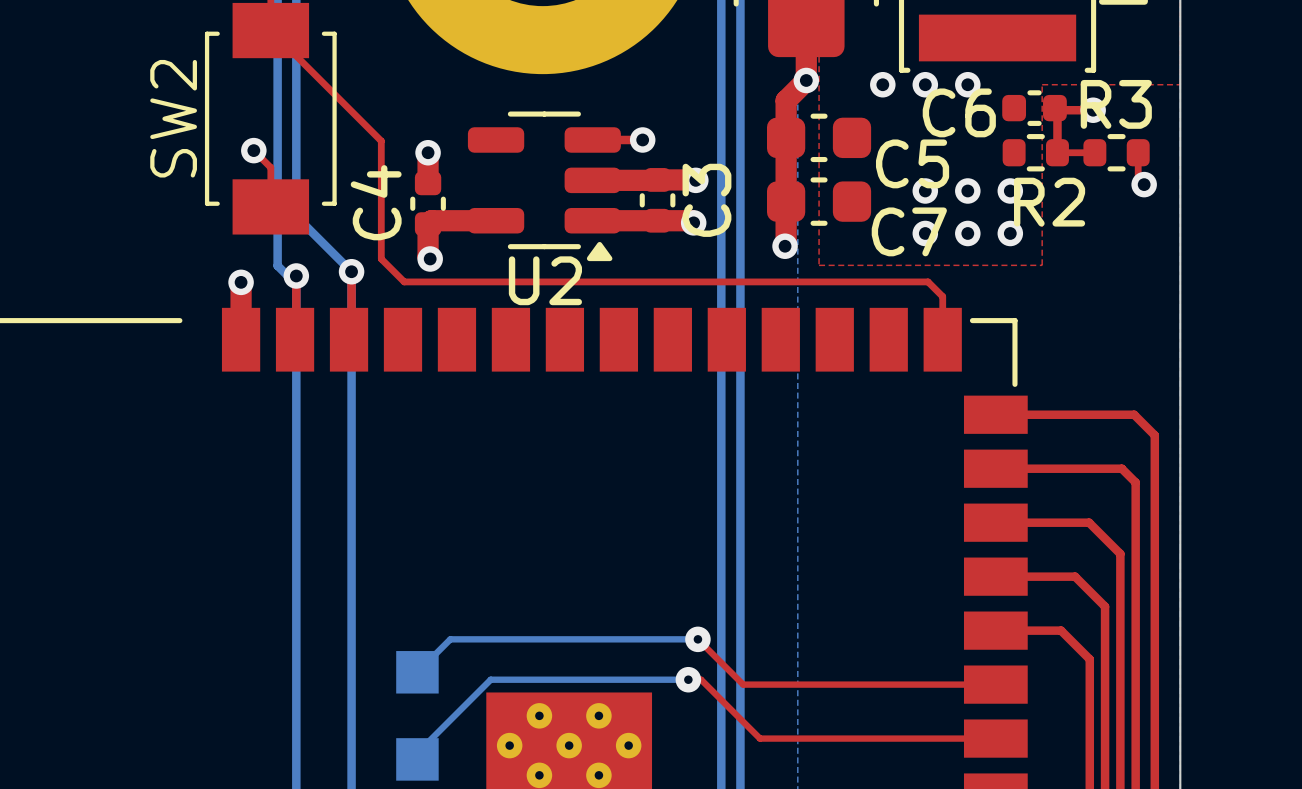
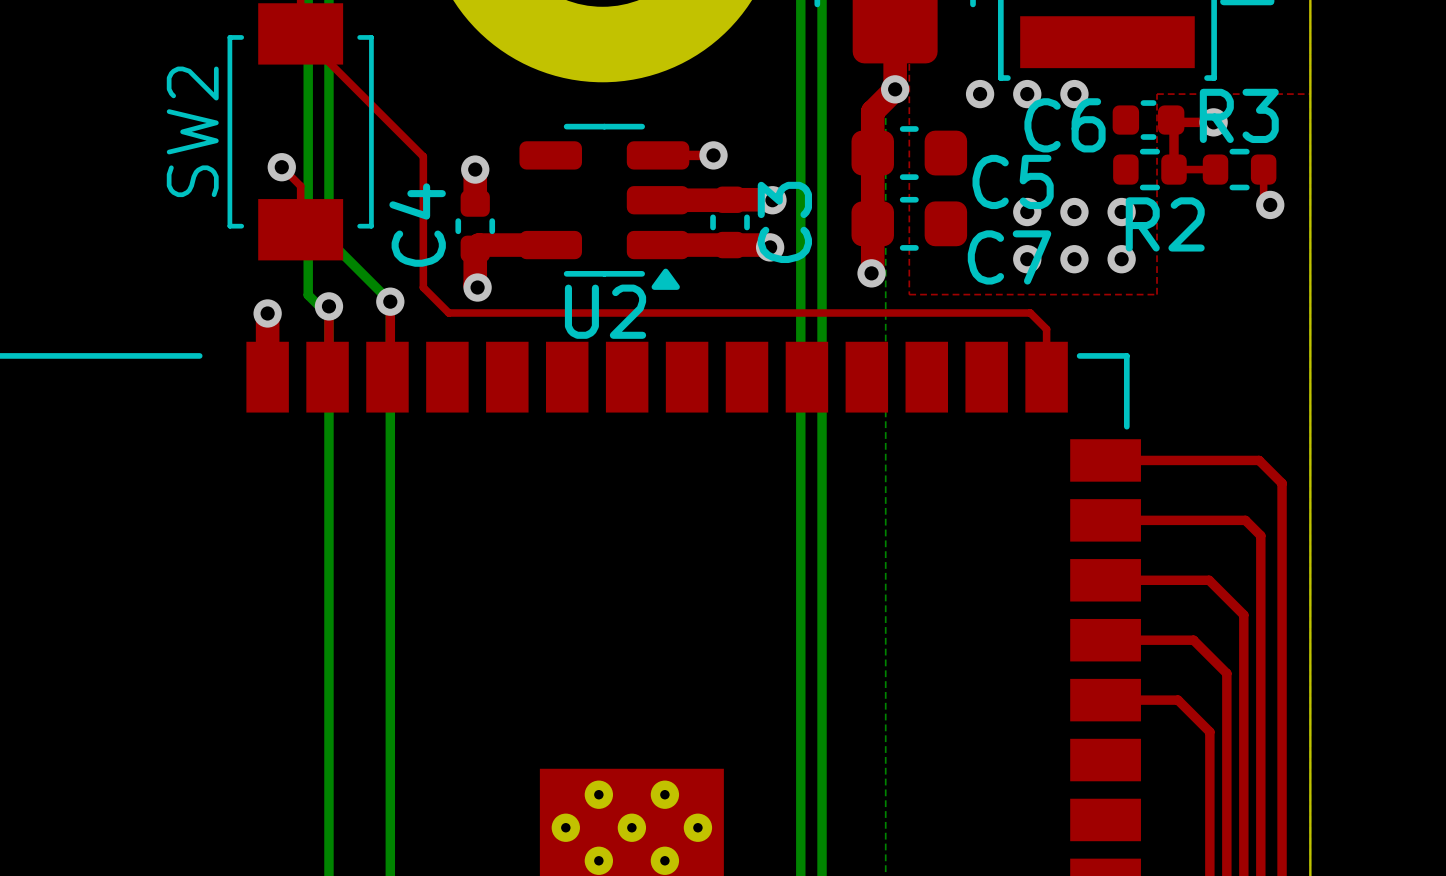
top track: (697, 639) (743, 684) (995, 684) -> none
bottom track: (697, 639) (450, 639) (417, 672) -> none
via: (697, 639) -> none
part: (417, 672) -> none
top track: (688, 679) (701, 679) (759, 738) (995, 738) -> none
bottom track: (688, 679) (490, 679) (417, 753) (417, 759) -> none
via: (688, 679) -> none
part: (417, 759) -> none

